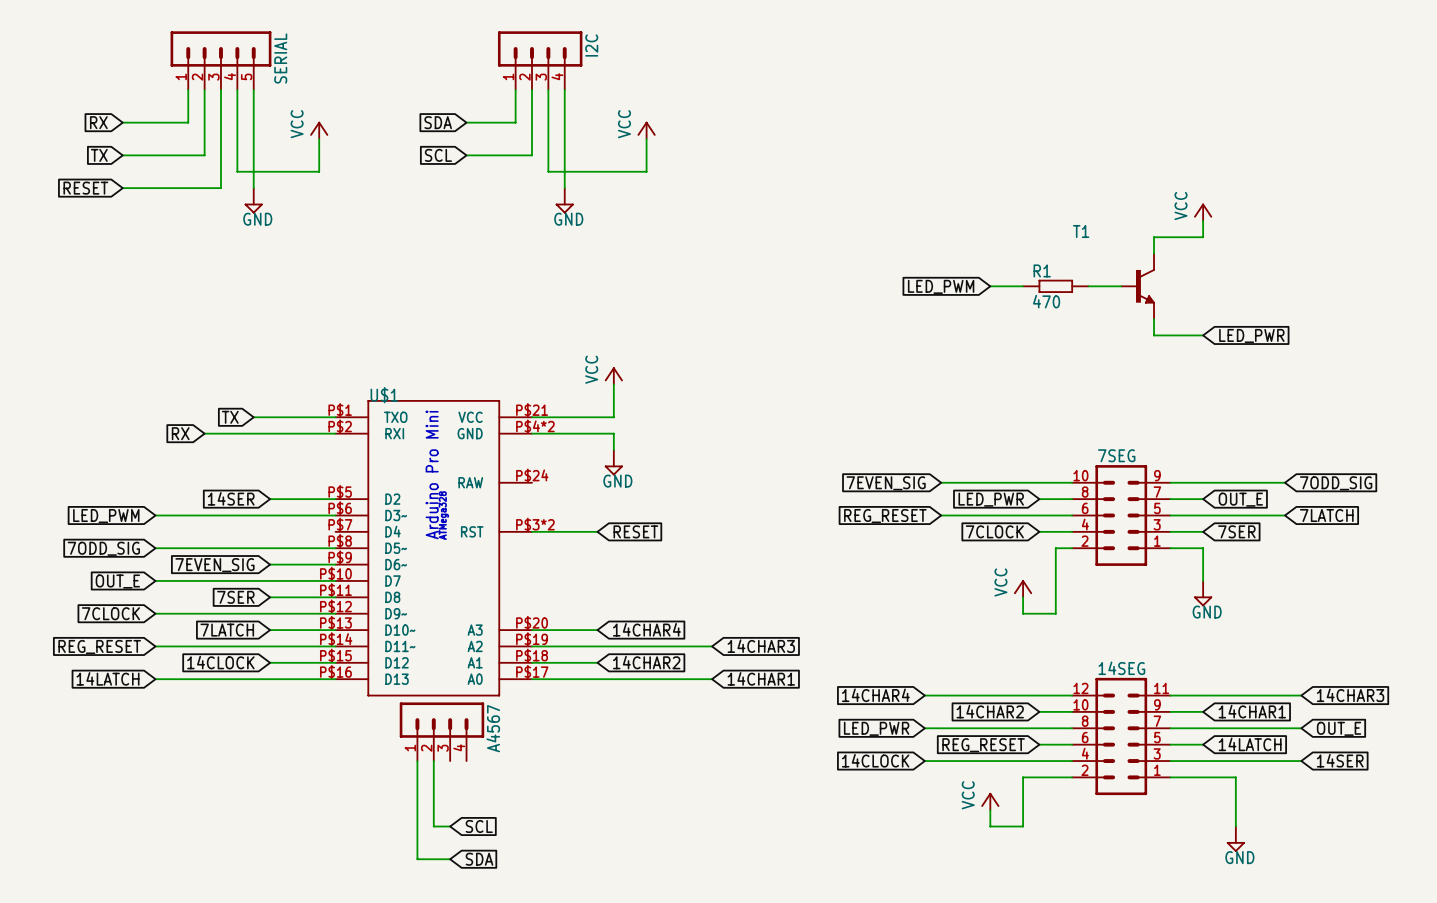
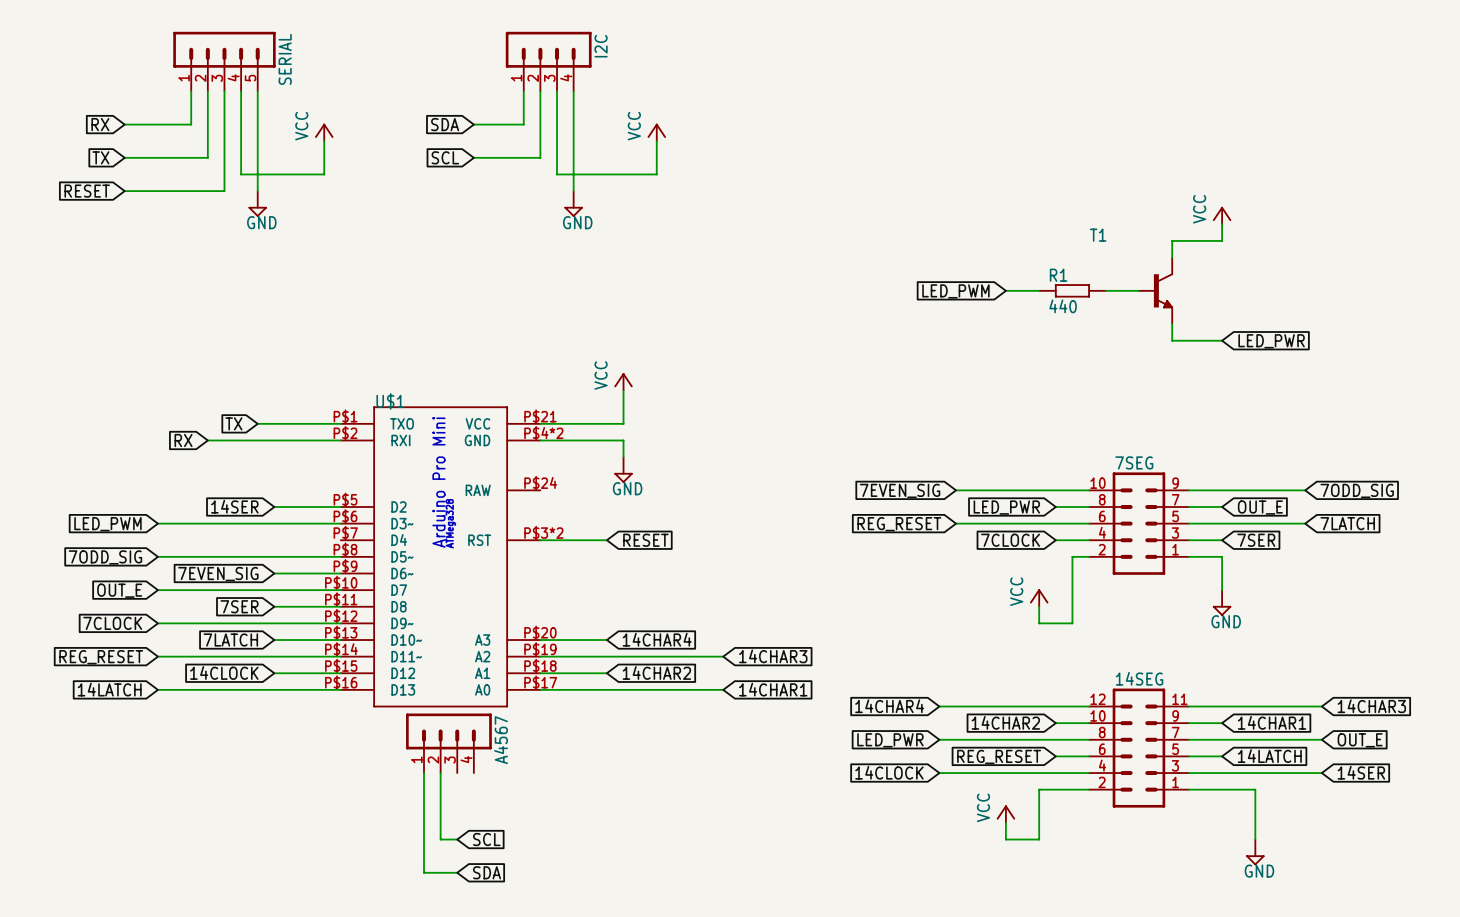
R1 value: 470 (1046, 301) -> 440 (1063, 306)

